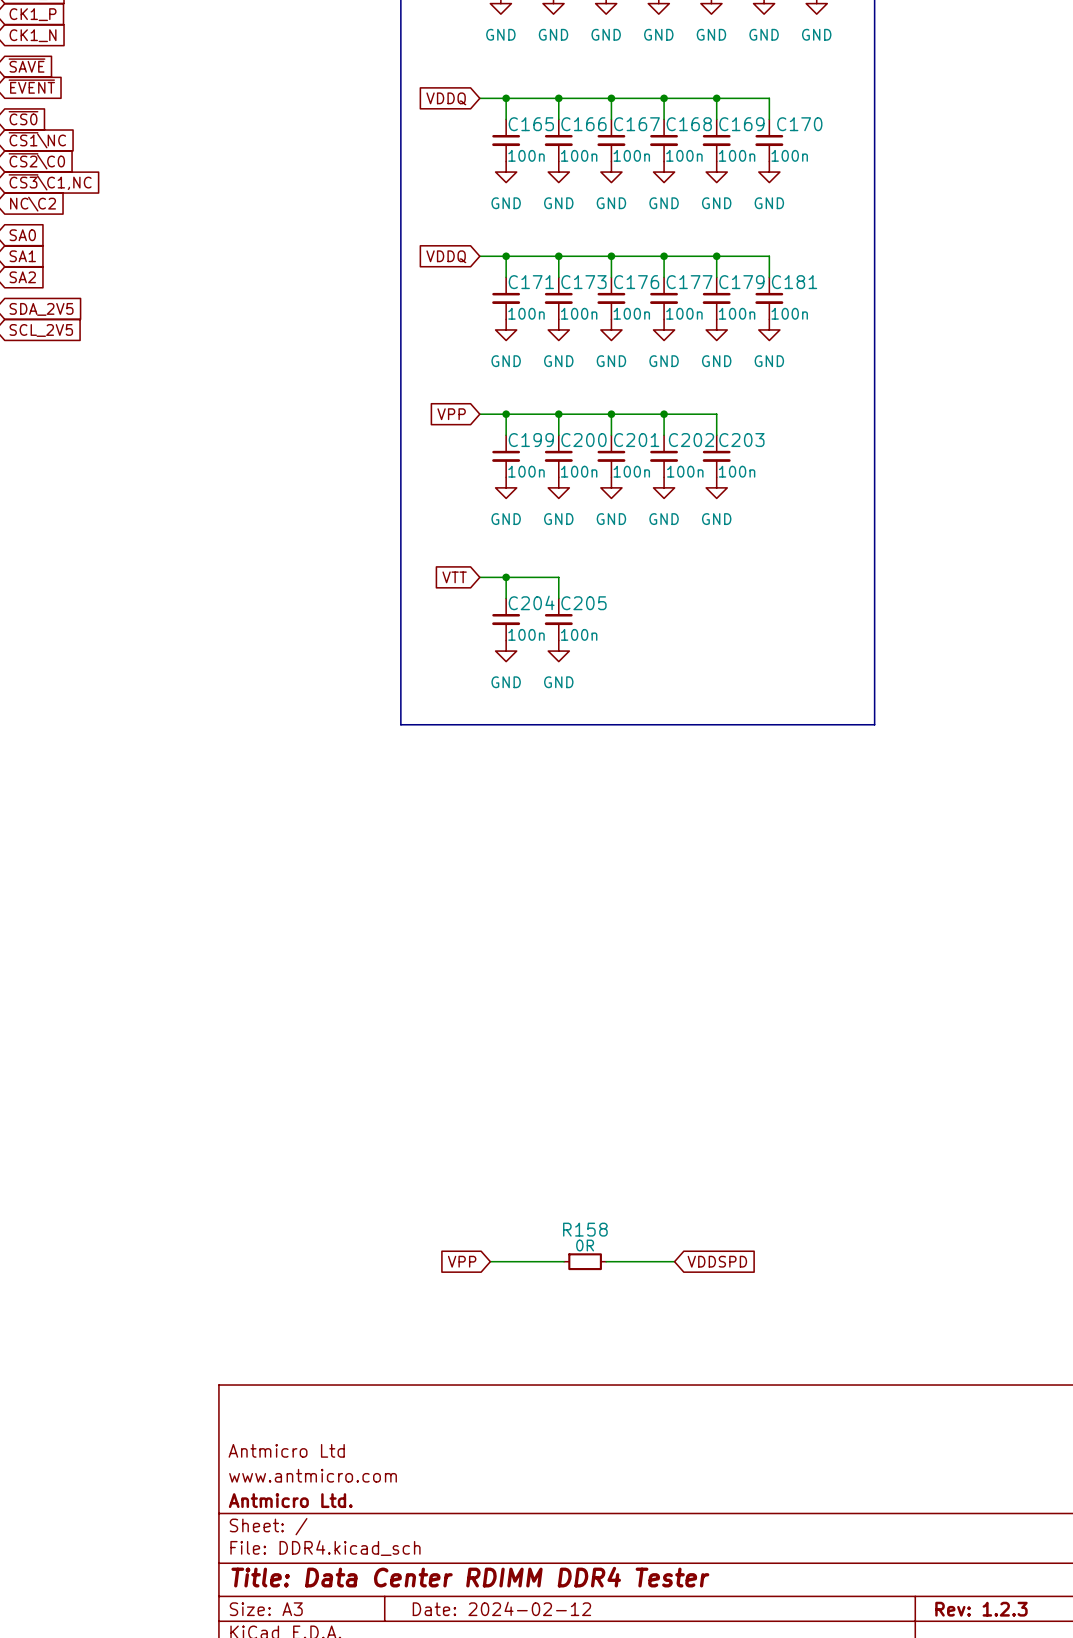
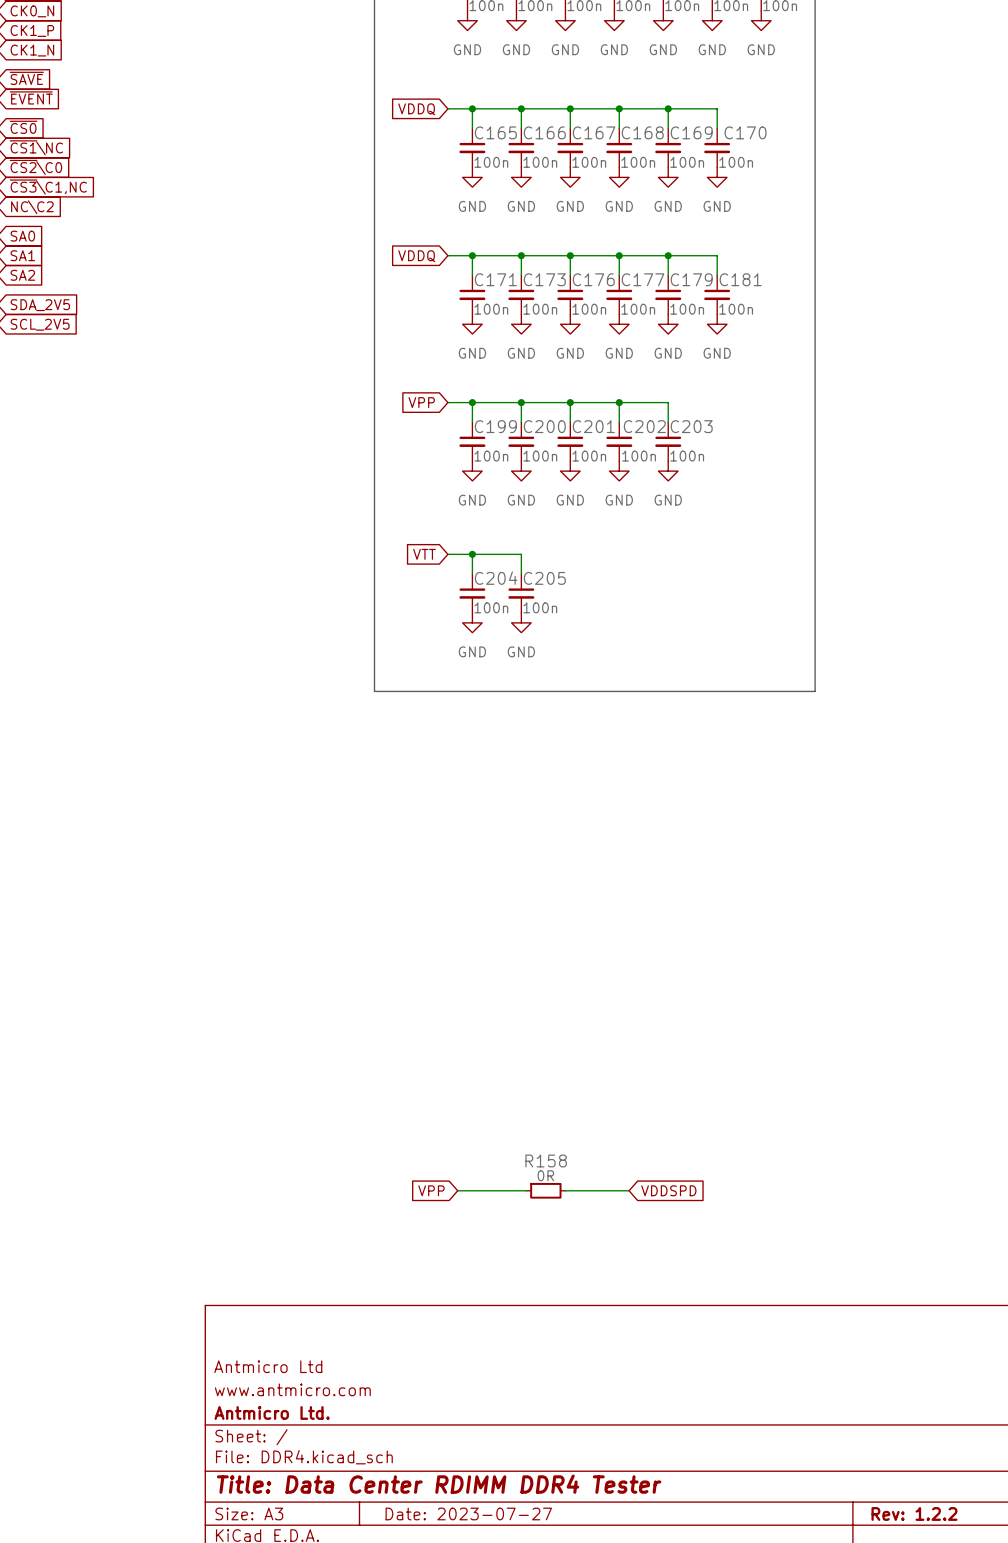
title block: Date: 2024-02-12 (501, 1608) -> Date: 2023-07-27 (468, 1513)
title block: Rev: 1.2.3 (981, 1609) -> Rev: 1.2.2 (914, 1513)

